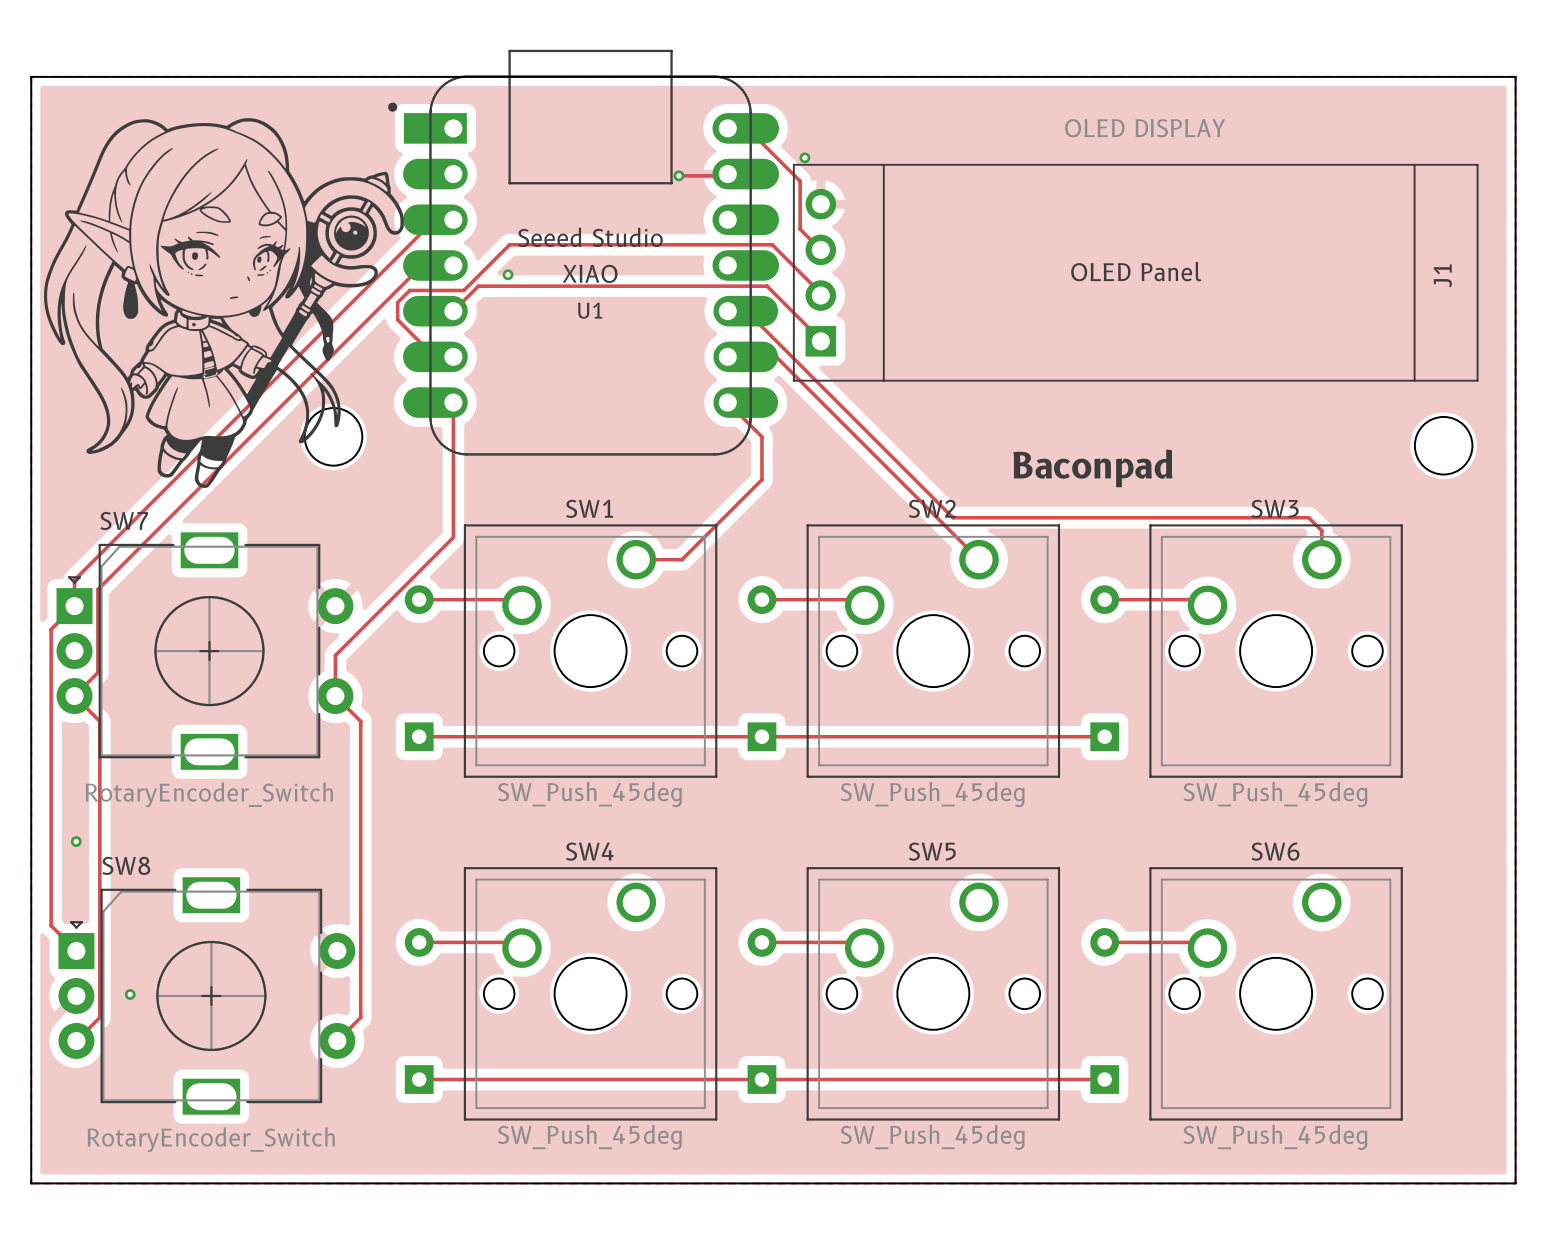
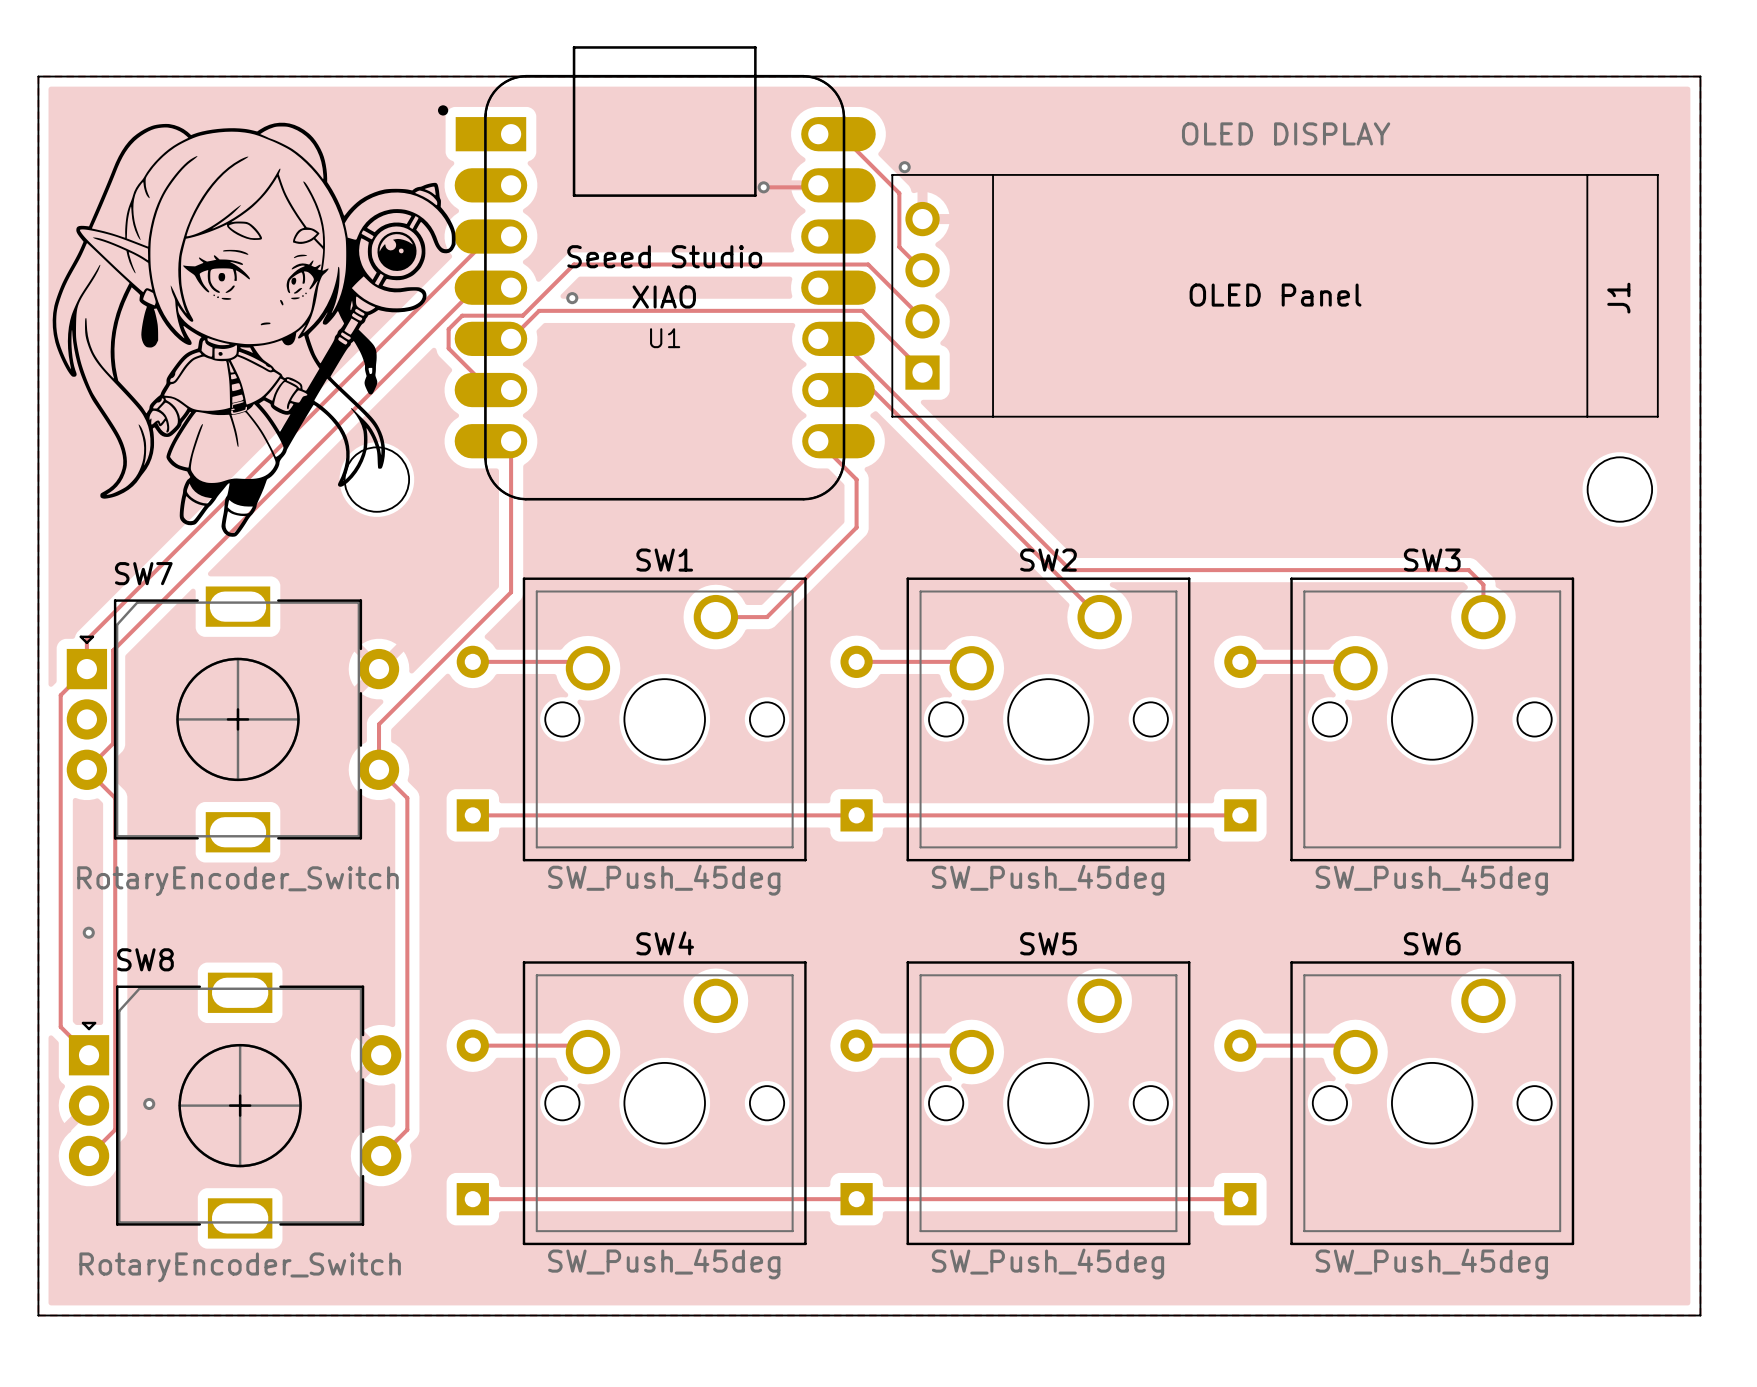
text: Baconpad (1092, 468) -> none

